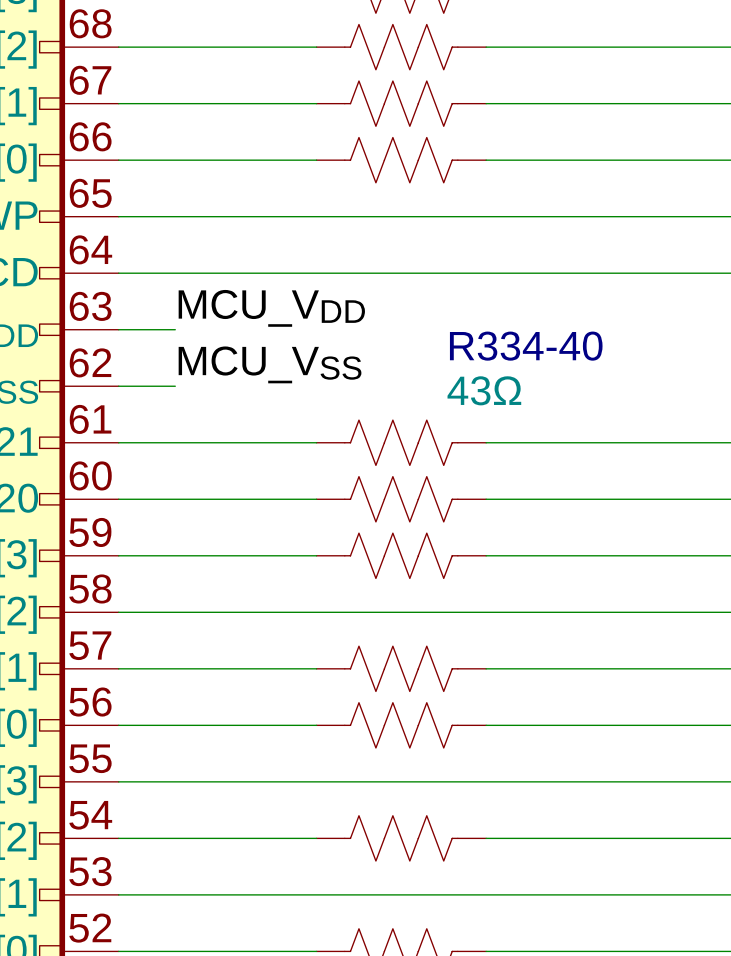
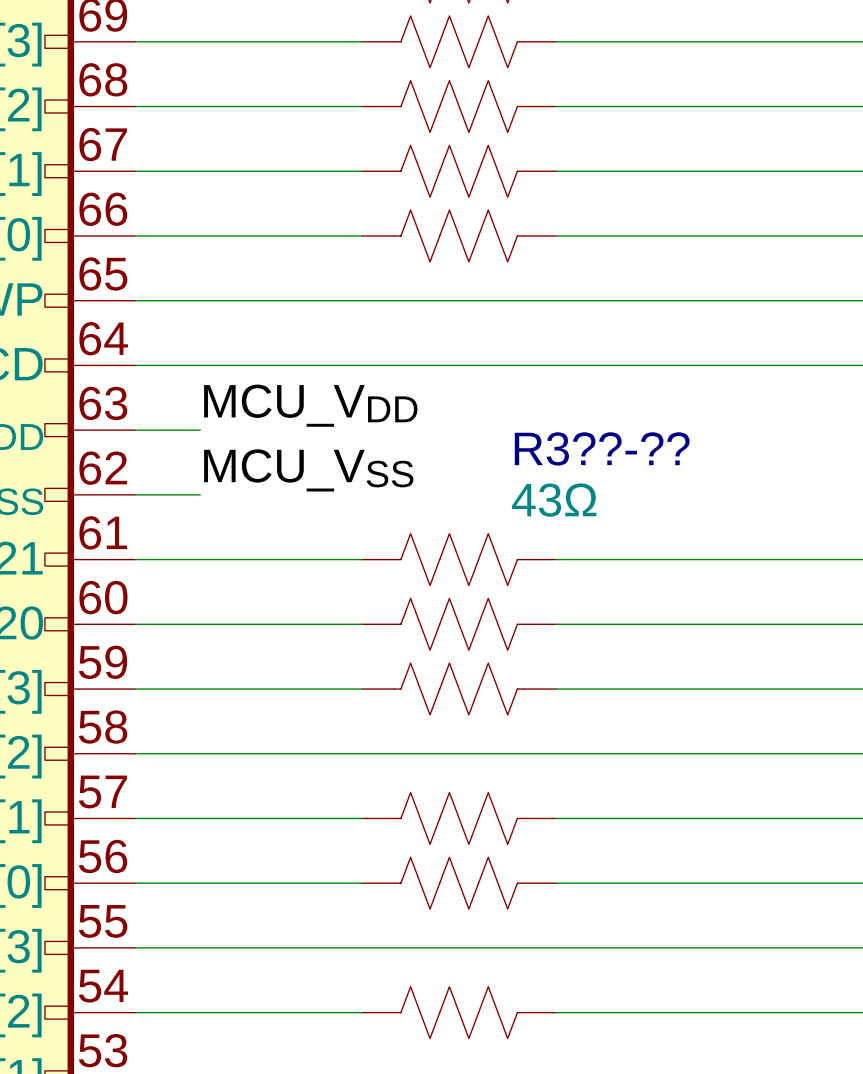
text: R334-40 (526, 346) -> R3??-?? (602, 448)

